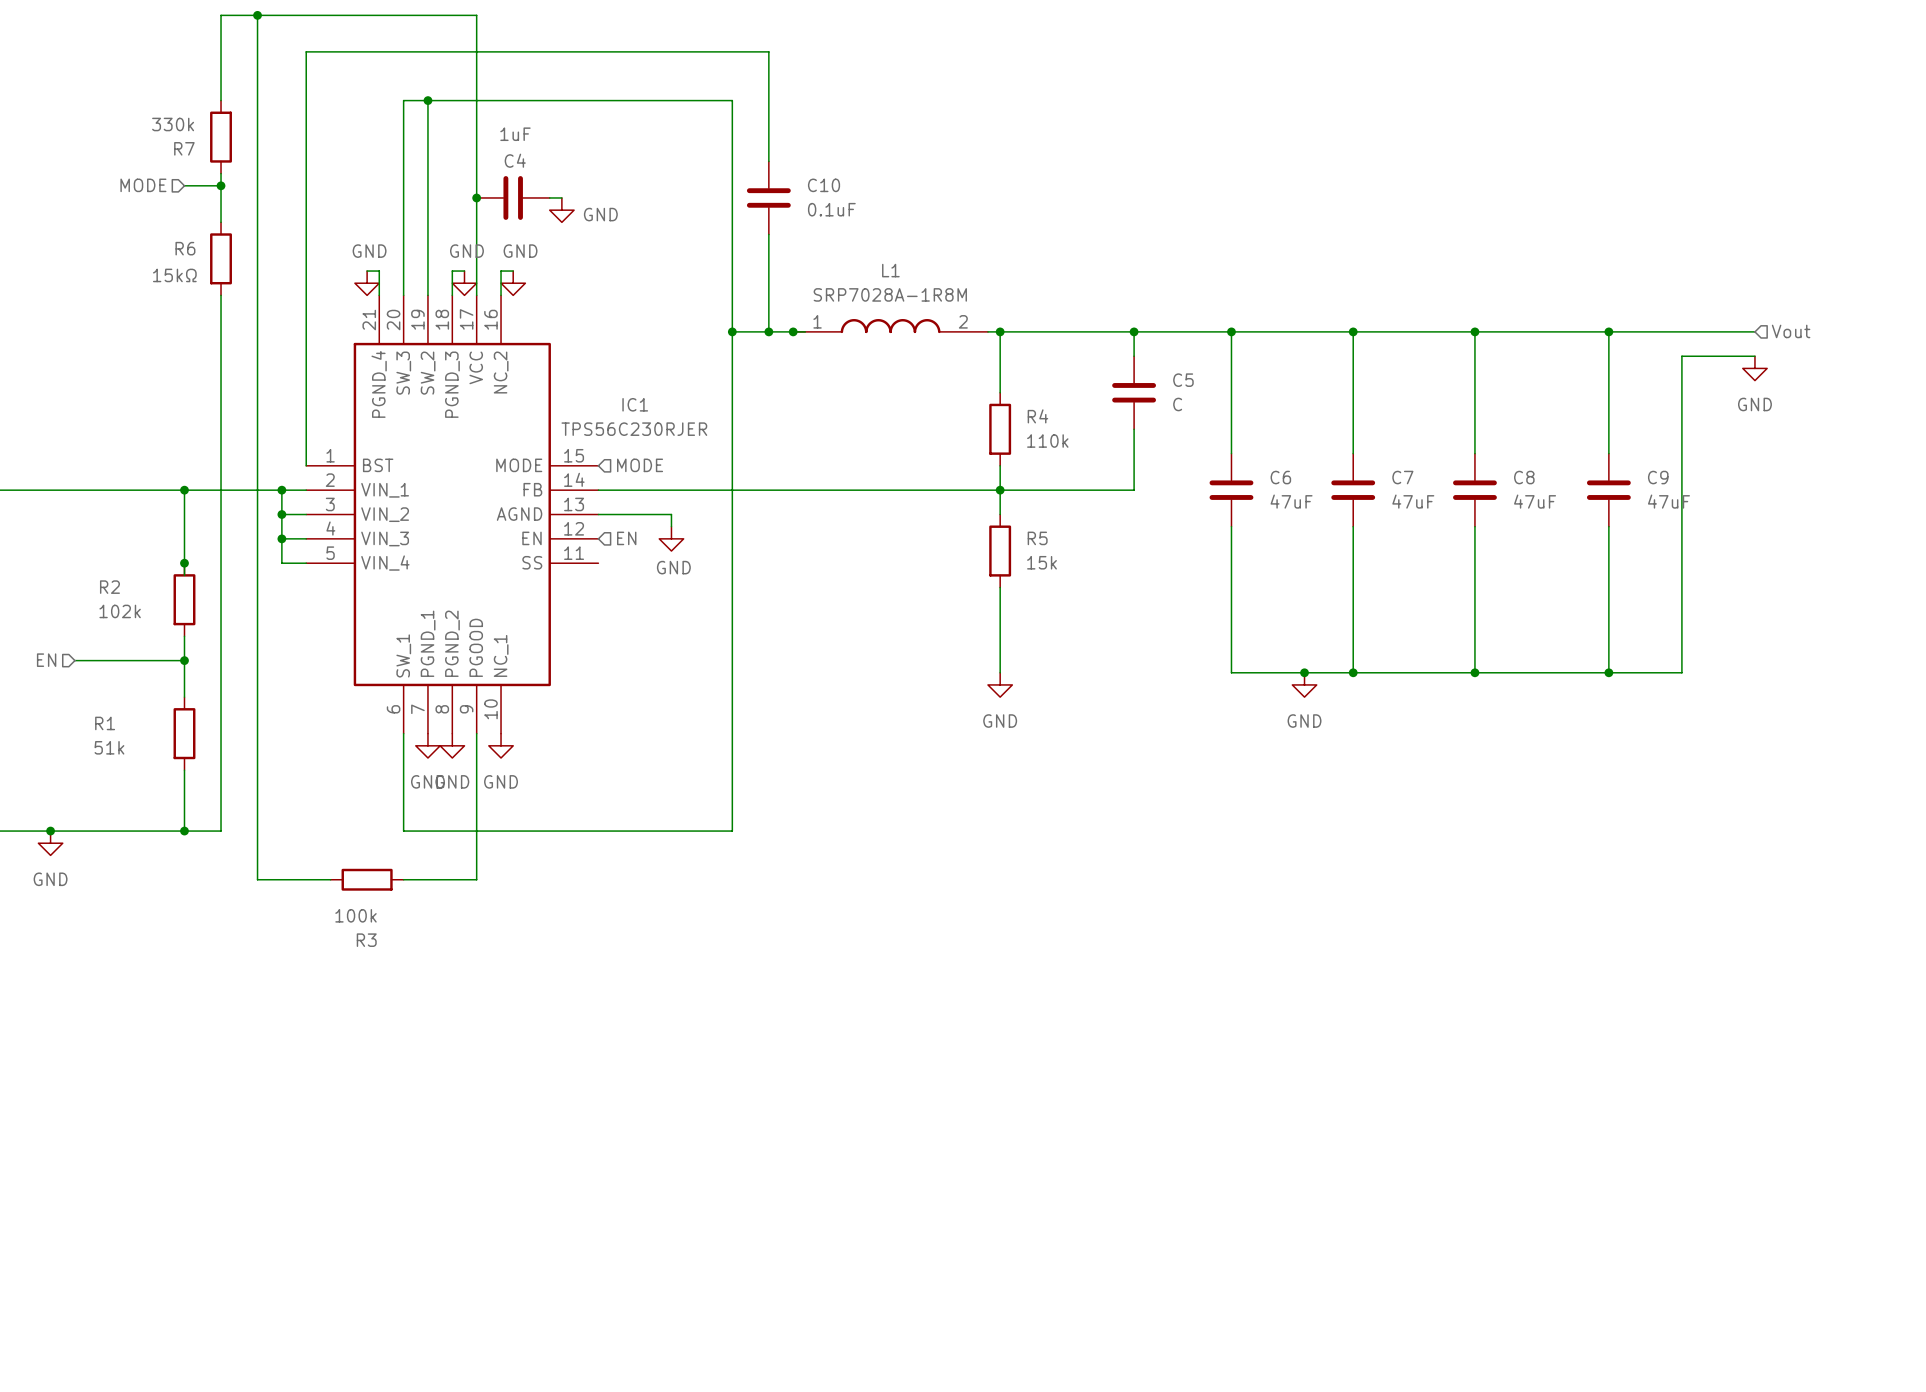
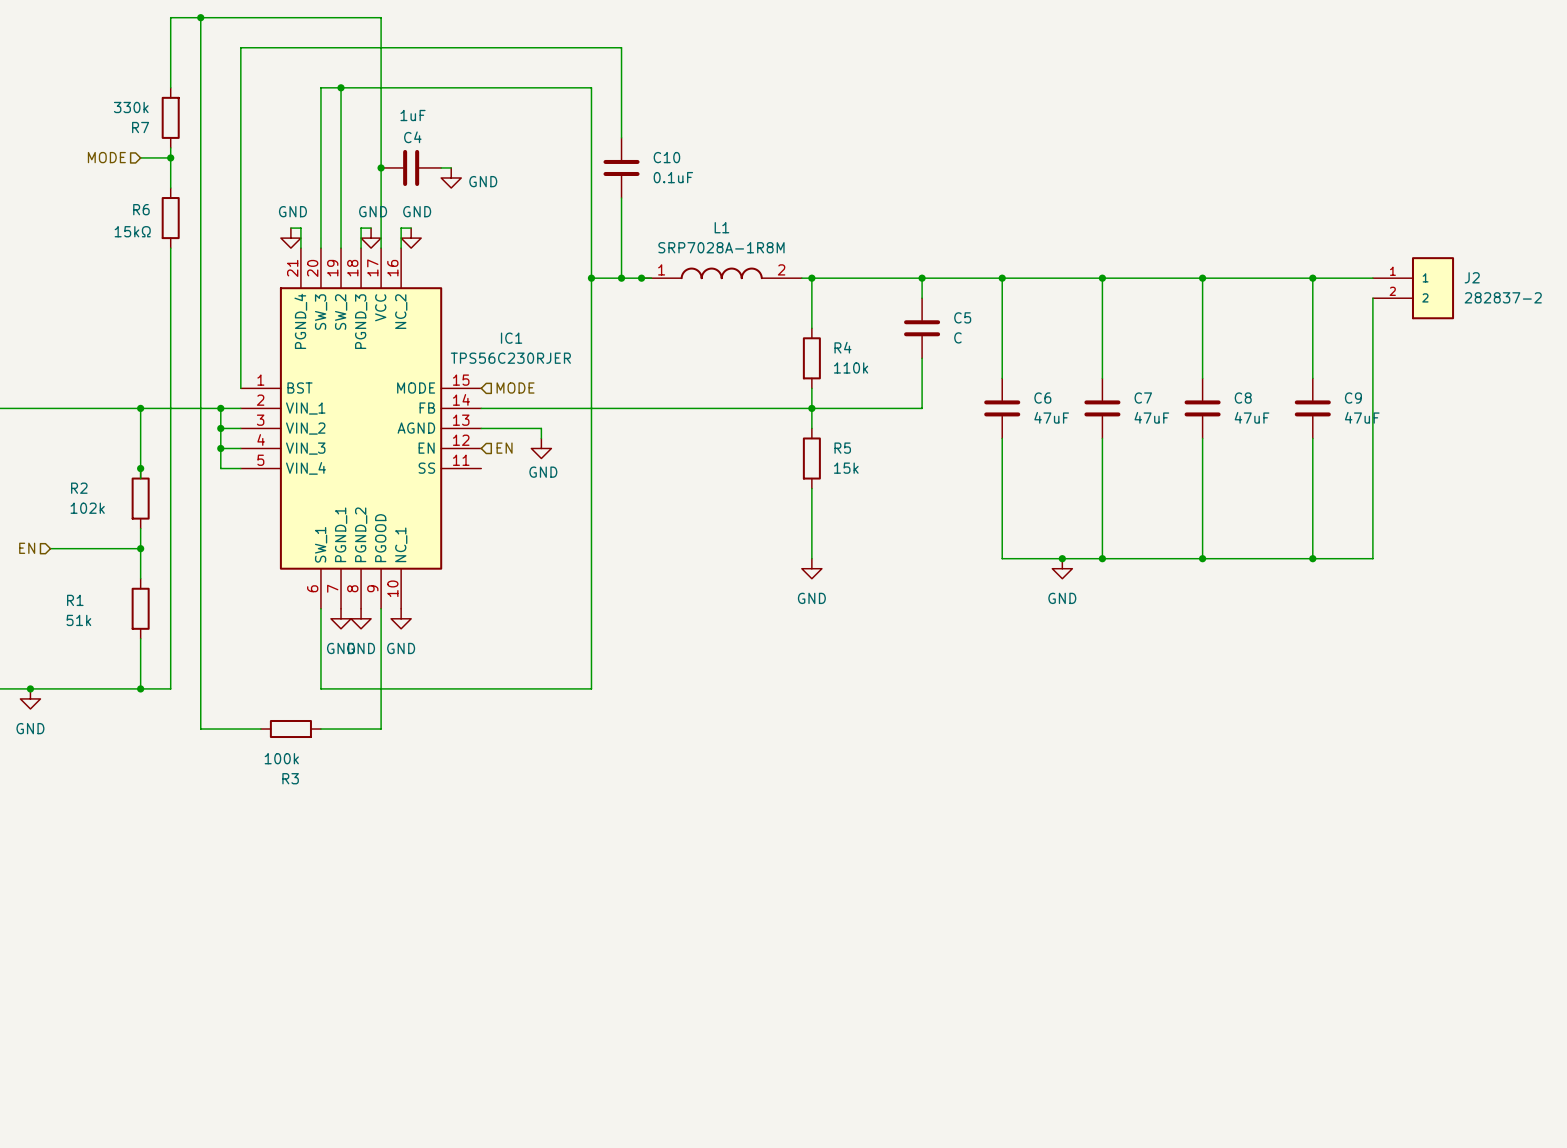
hierarchical label: Vout (1791, 331) -> none
J2: none -> 282837-2 (1413, 288)
power symbol: GND (1754, 368) -> none

